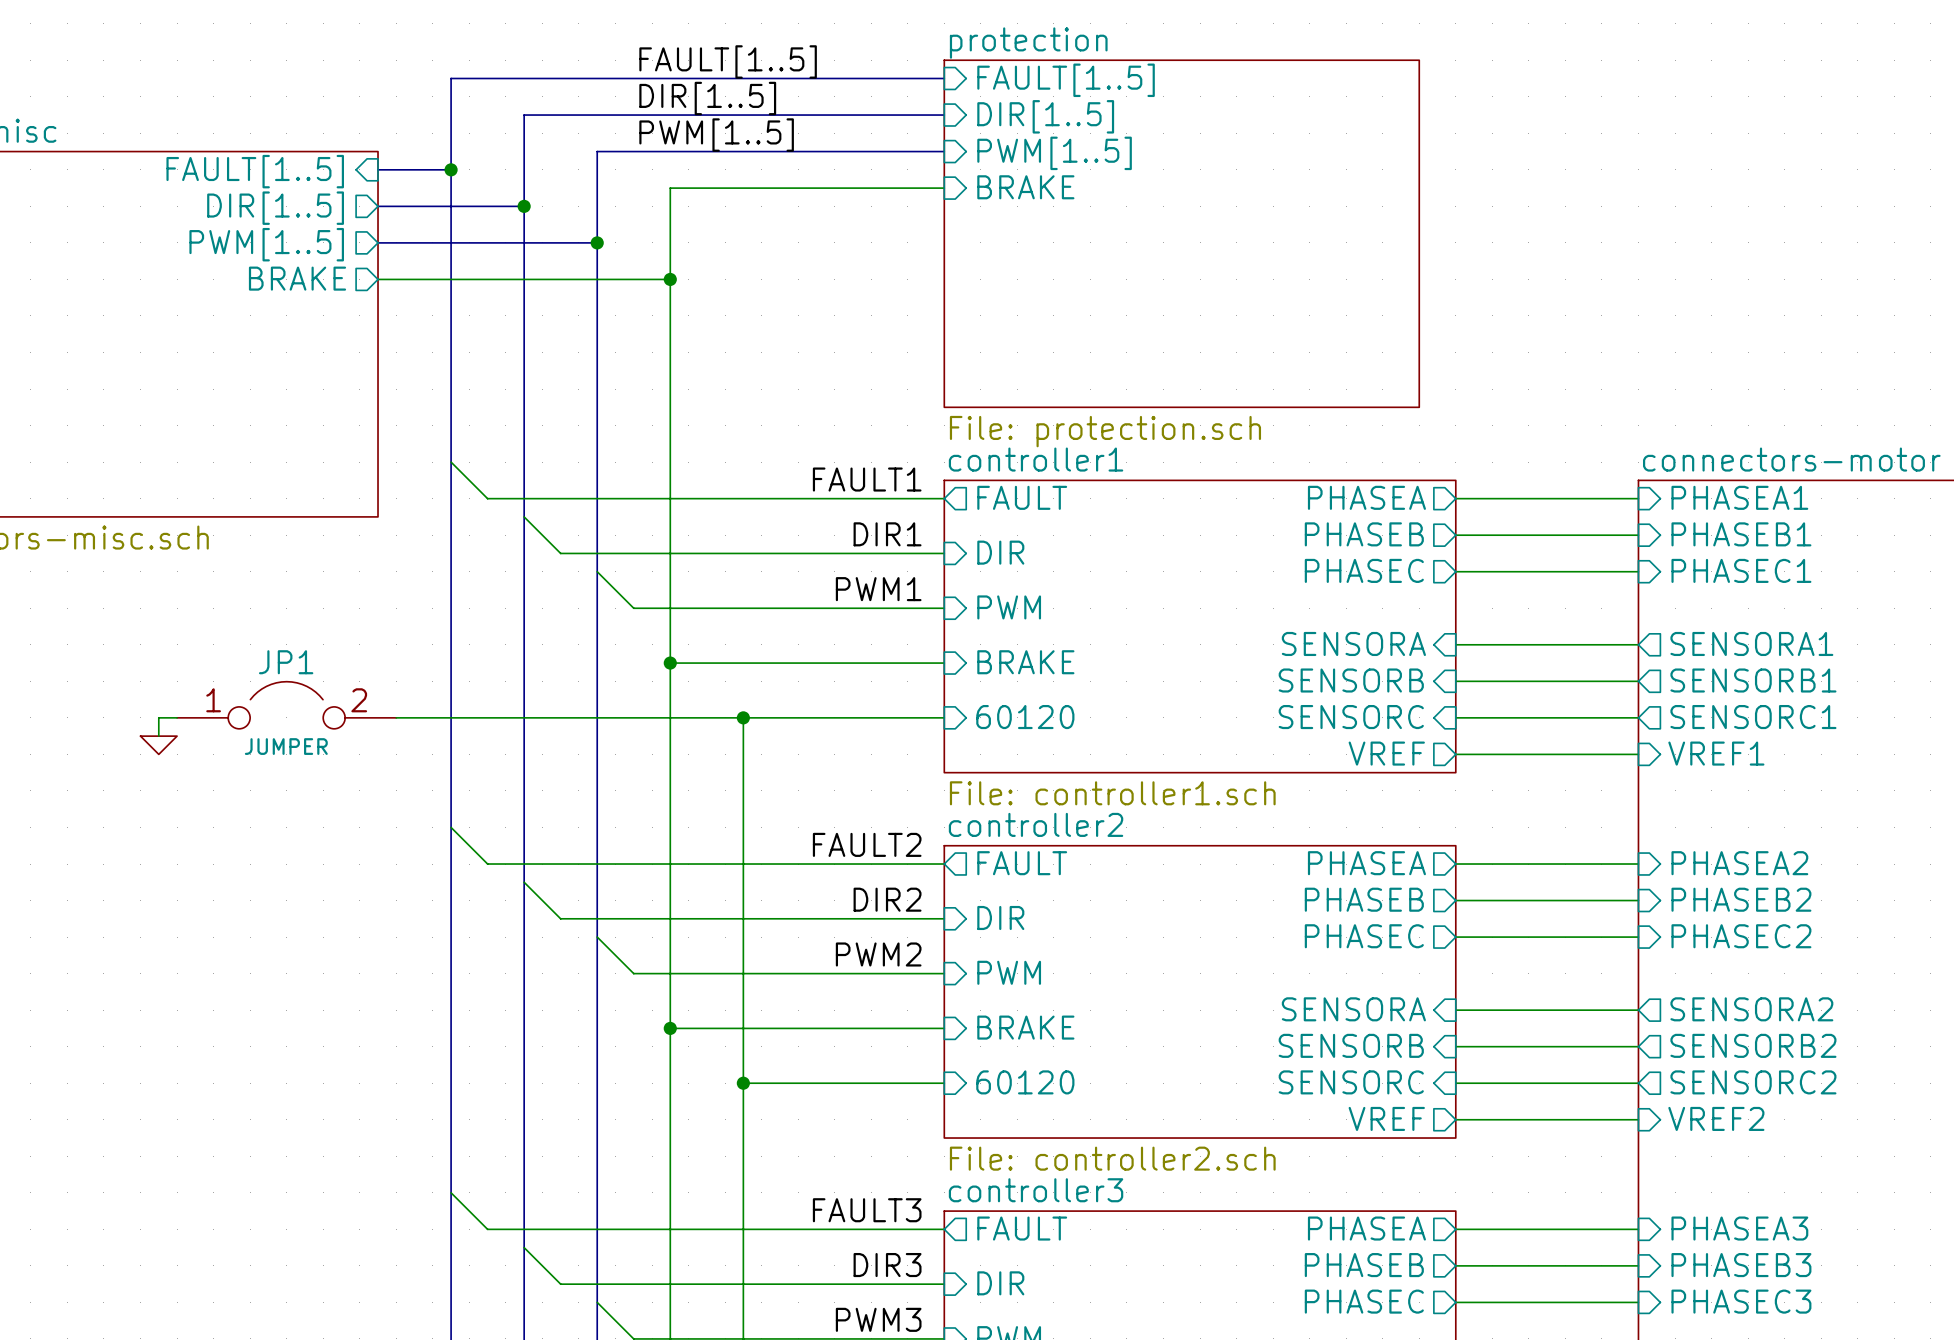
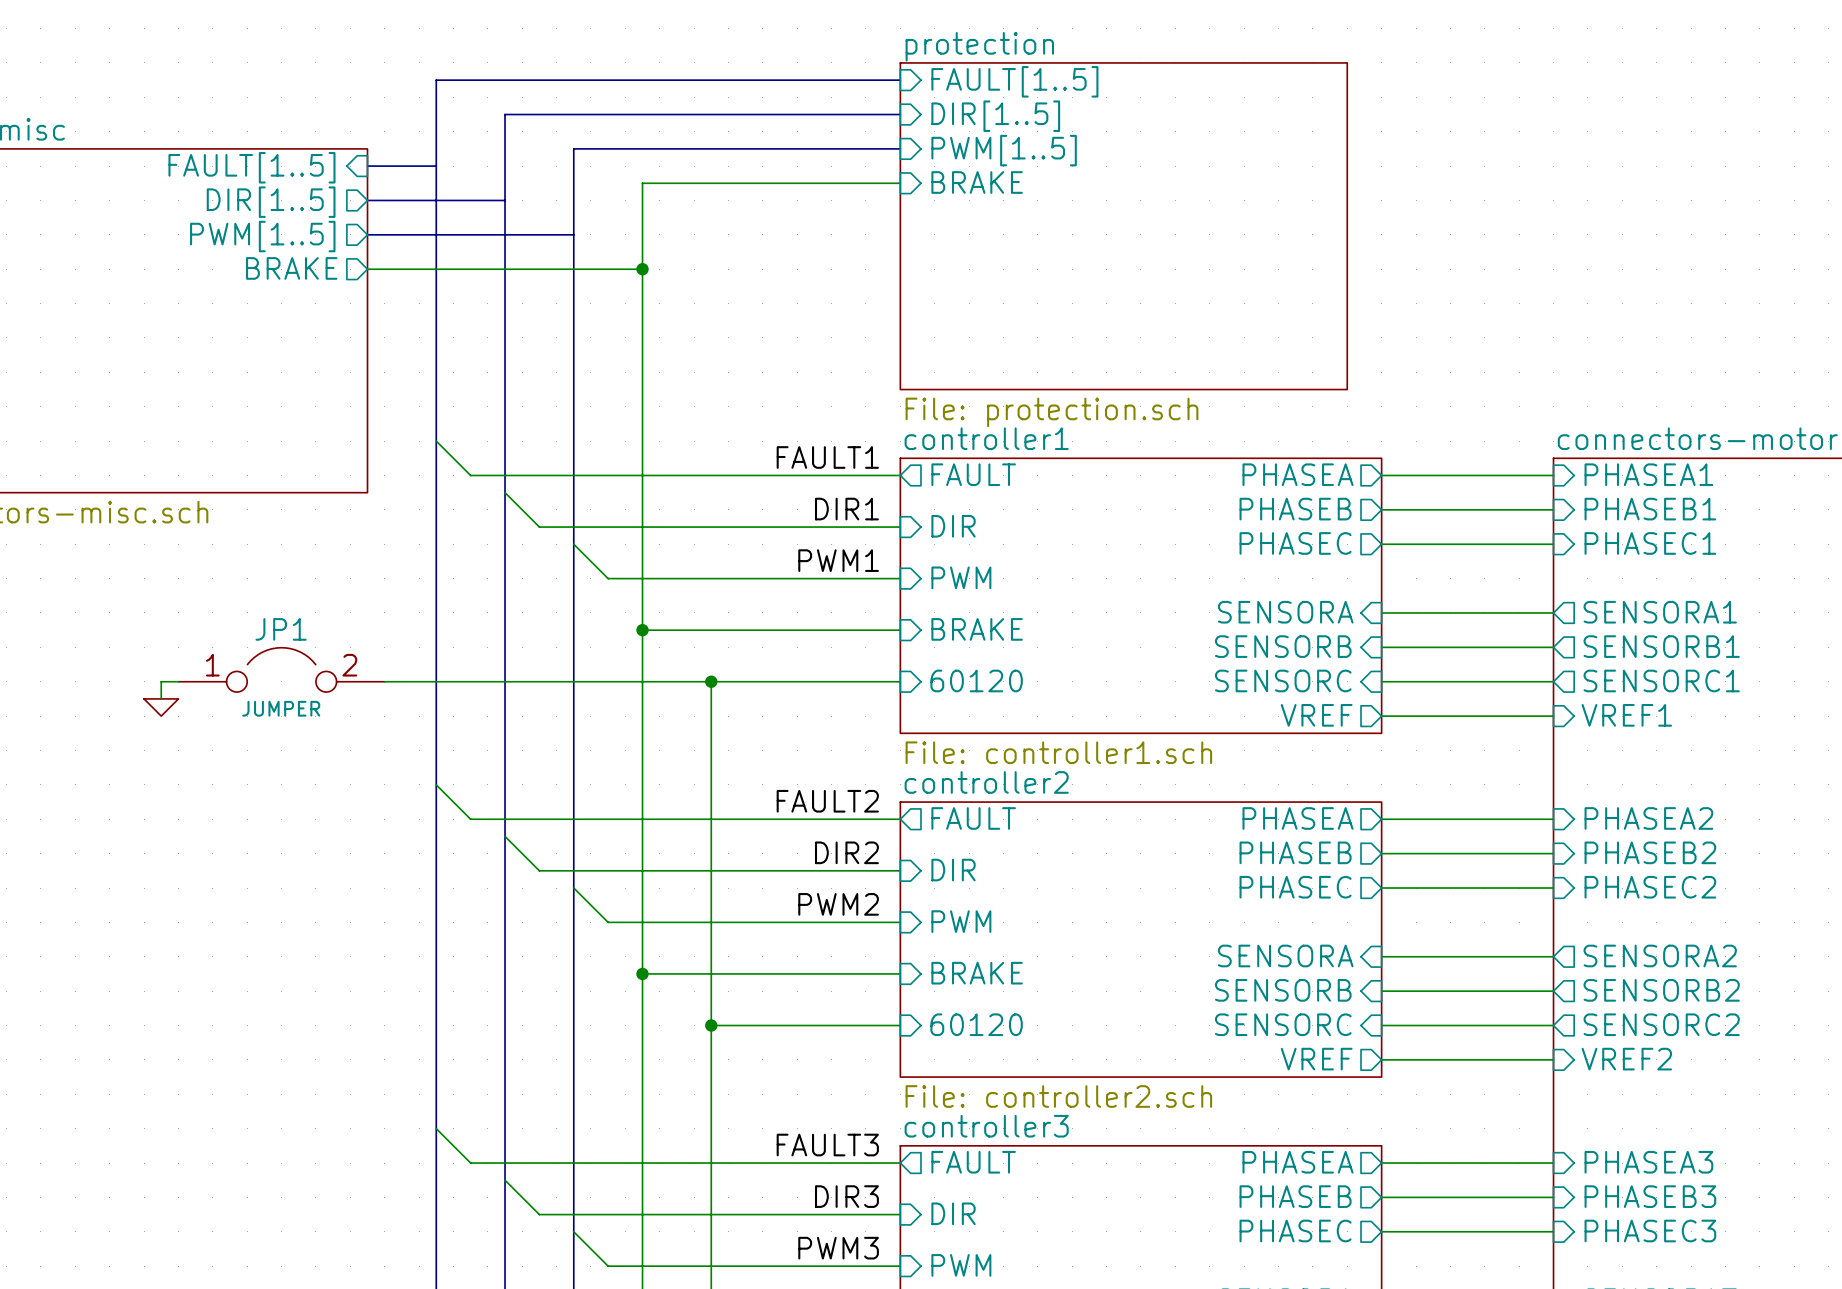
label: FAULT[1..5] (728, 61) -> none
label: DIR[1..5] (707, 98) -> none
label: PWM[1..5] (716, 135) -> none
junction: (451, 169) -> none
junction: (524, 206) -> none
junction: (597, 242) -> none

